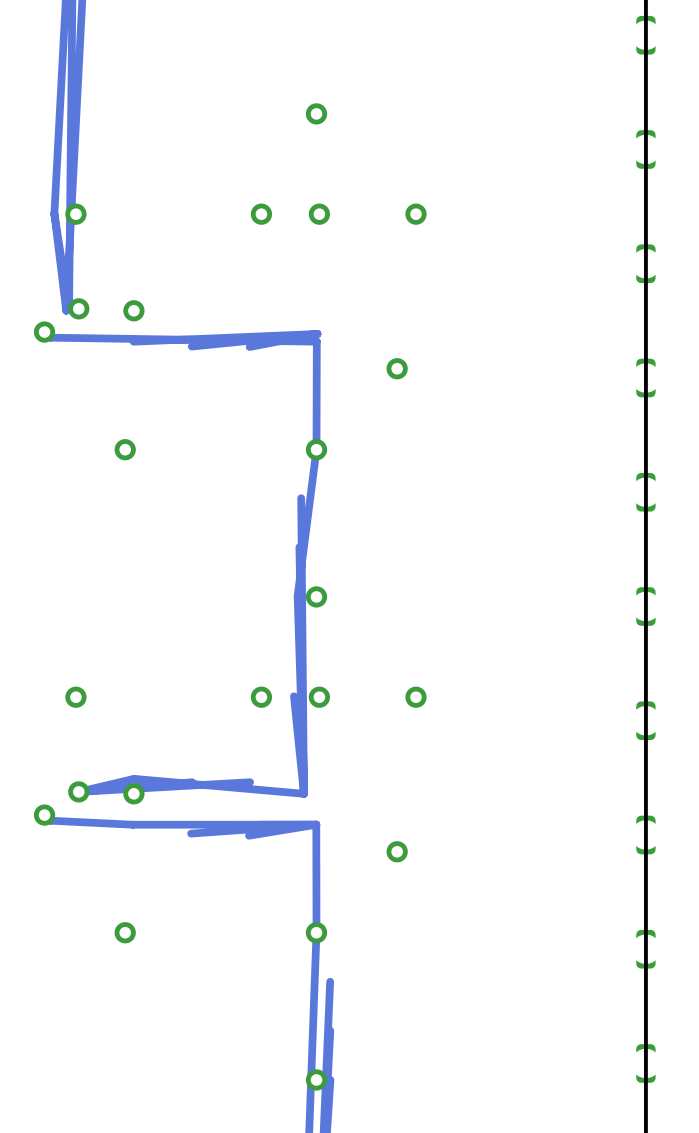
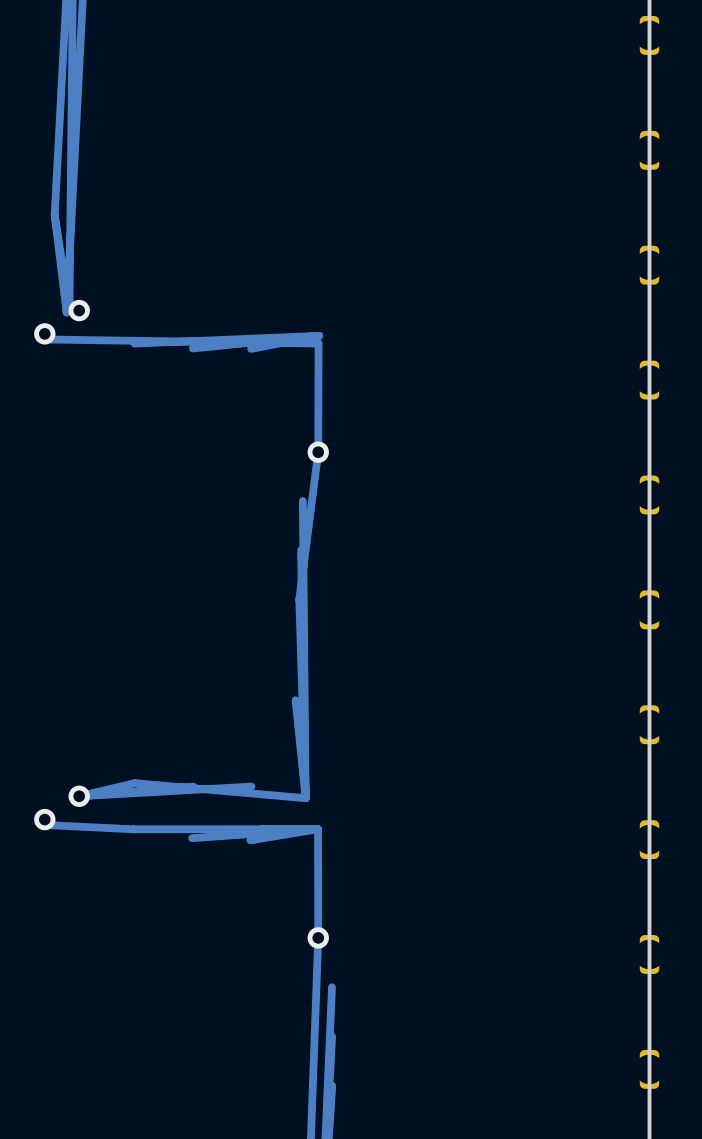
via: (316, 113) -> none
via: (75, 214) -> none
via: (261, 214) -> none
via: (319, 214) -> none
via: (416, 214) -> none
via: (133, 310) -> none
via: (397, 368) -> none
via: (125, 449) -> none
via: (316, 596) -> none
via: (75, 697) -> none
via: (261, 697) -> none
via: (319, 697) -> none
via: (416, 697) -> none
via: (133, 793) -> none
via: (397, 851) -> none
via: (125, 932) -> none
via: (316, 1079) -> none

